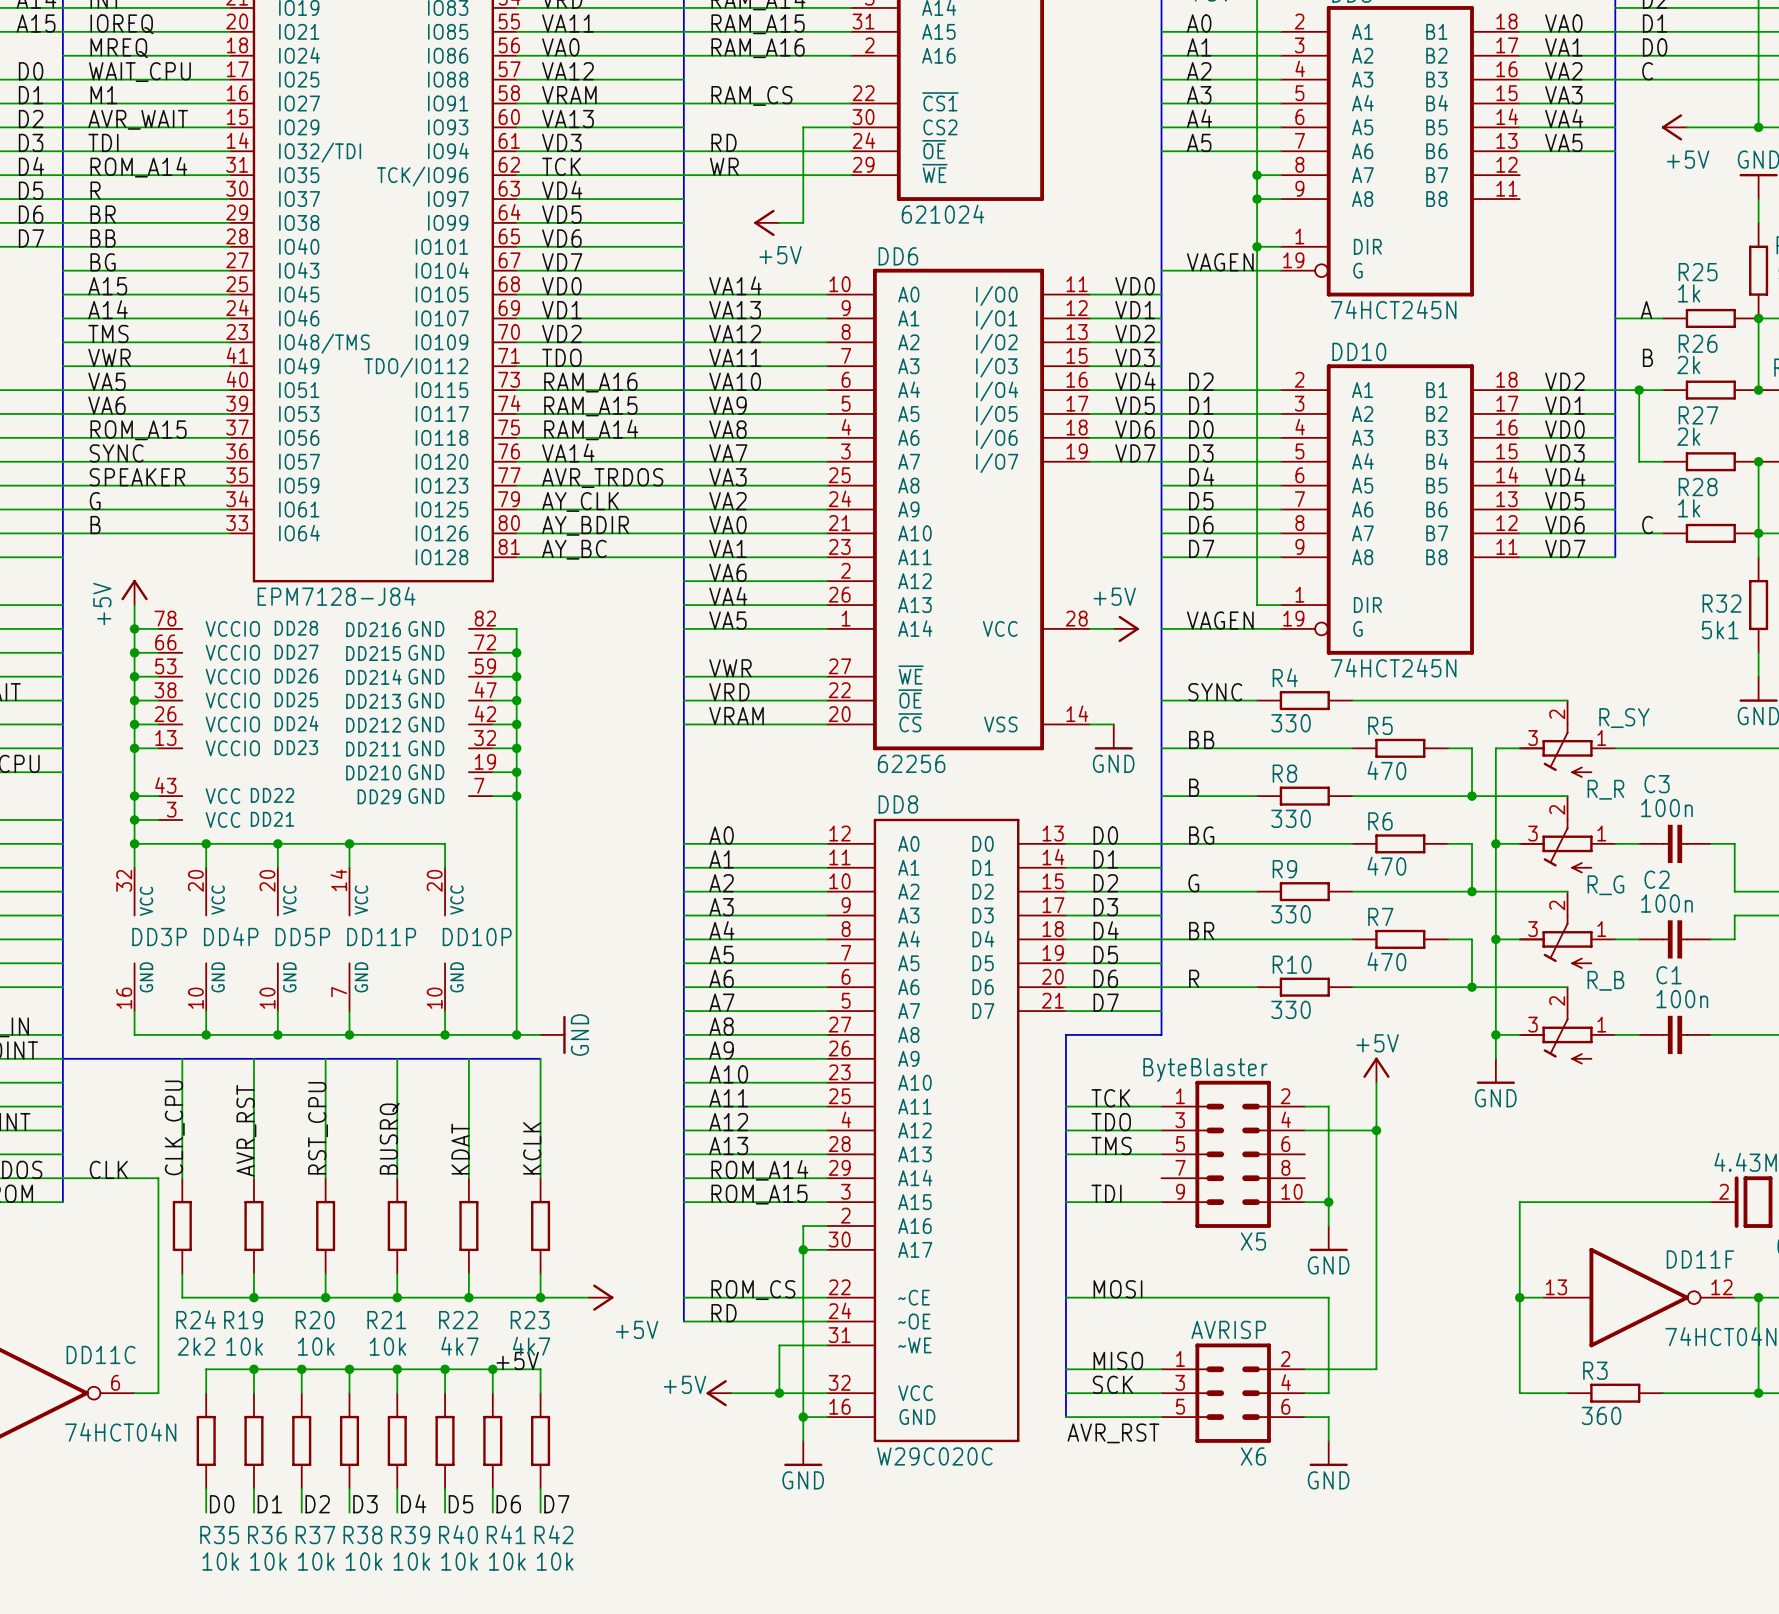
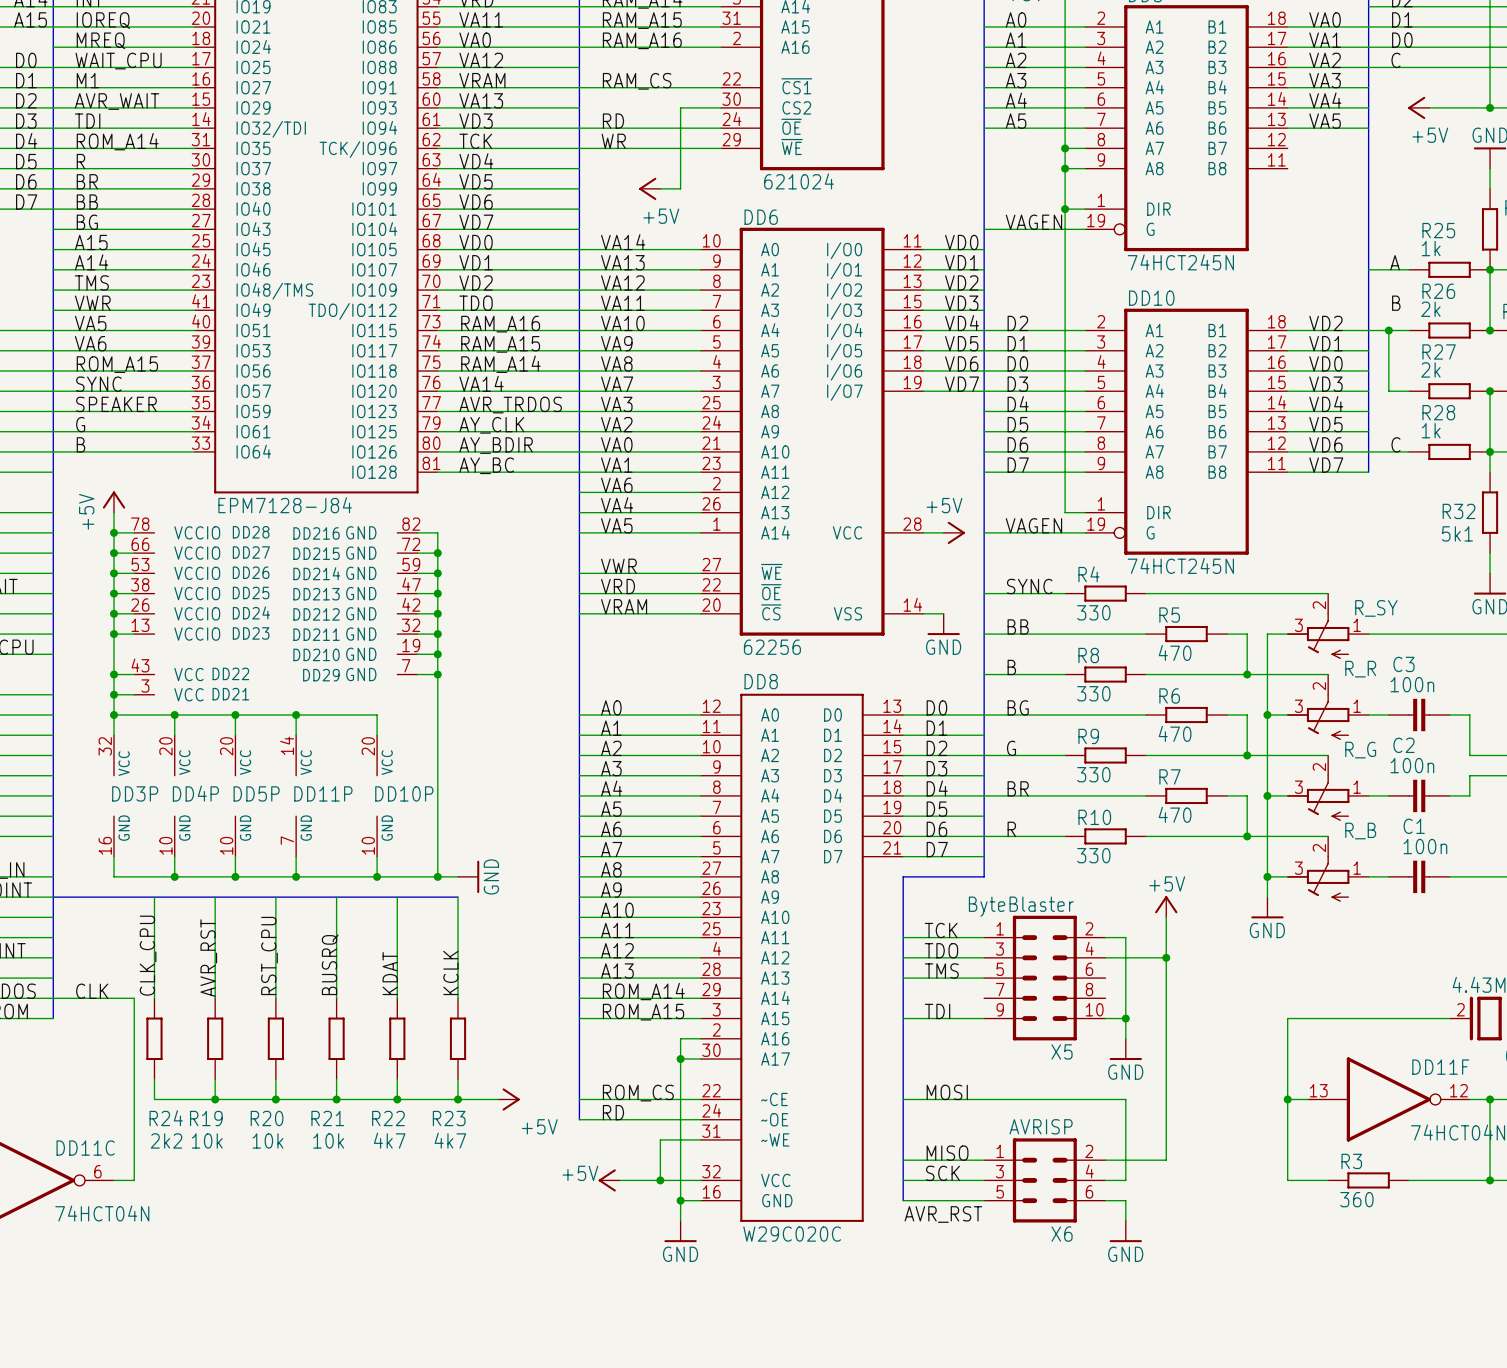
label: +5V (517, 1360) -> none
wire: (253, 1369) (253, 1393) -> none
junction: (253, 1369) -> none
wire: (301, 1369) (301, 1393) -> none
junction: (301, 1369) -> none
wire: (349, 1369) (349, 1393) -> none
junction: (349, 1369) -> none
wire: (397, 1369) (397, 1393) -> none
junction: (397, 1369) -> none
wire: (445, 1369) (445, 1393) -> none
junction: (445, 1369) -> none
wire: (492, 1369) (492, 1393) -> none
junction: (492, 1369) -> none
wire: (206, 1393) (206, 1369) (540, 1369) (540, 1393) -> none
R35: 10k (206, 1440) -> none
R36: 10k (253, 1440) -> none
R37: 10k (301, 1440) -> none
R38: 10k (349, 1440) -> none
R39: 10k (397, 1440) -> none
R40: 10k (445, 1440) -> none
R41: 10k (492, 1440) -> none
R42: 10k (540, 1440) -> none
wire: (206, 1488) (206, 1512) -> none
wire: (253, 1488) (253, 1512) -> none
wire: (301, 1488) (301, 1512) -> none
wire: (349, 1488) (349, 1512) -> none
wire: (397, 1488) (397, 1512) -> none
wire: (445, 1488) (445, 1512) -> none
wire: (492, 1488) (492, 1512) -> none
wire: (540, 1488) (540, 1512) -> none
label: D4 (413, 1503) -> none
label: D0 (222, 1504) -> none
label: D1 (269, 1504) -> none
label: D2 (317, 1504) -> none
label: D3 (365, 1504) -> none
label: D5 (460, 1504) -> none
label: D6 (508, 1504) -> none
label: D7 (556, 1504) -> none

